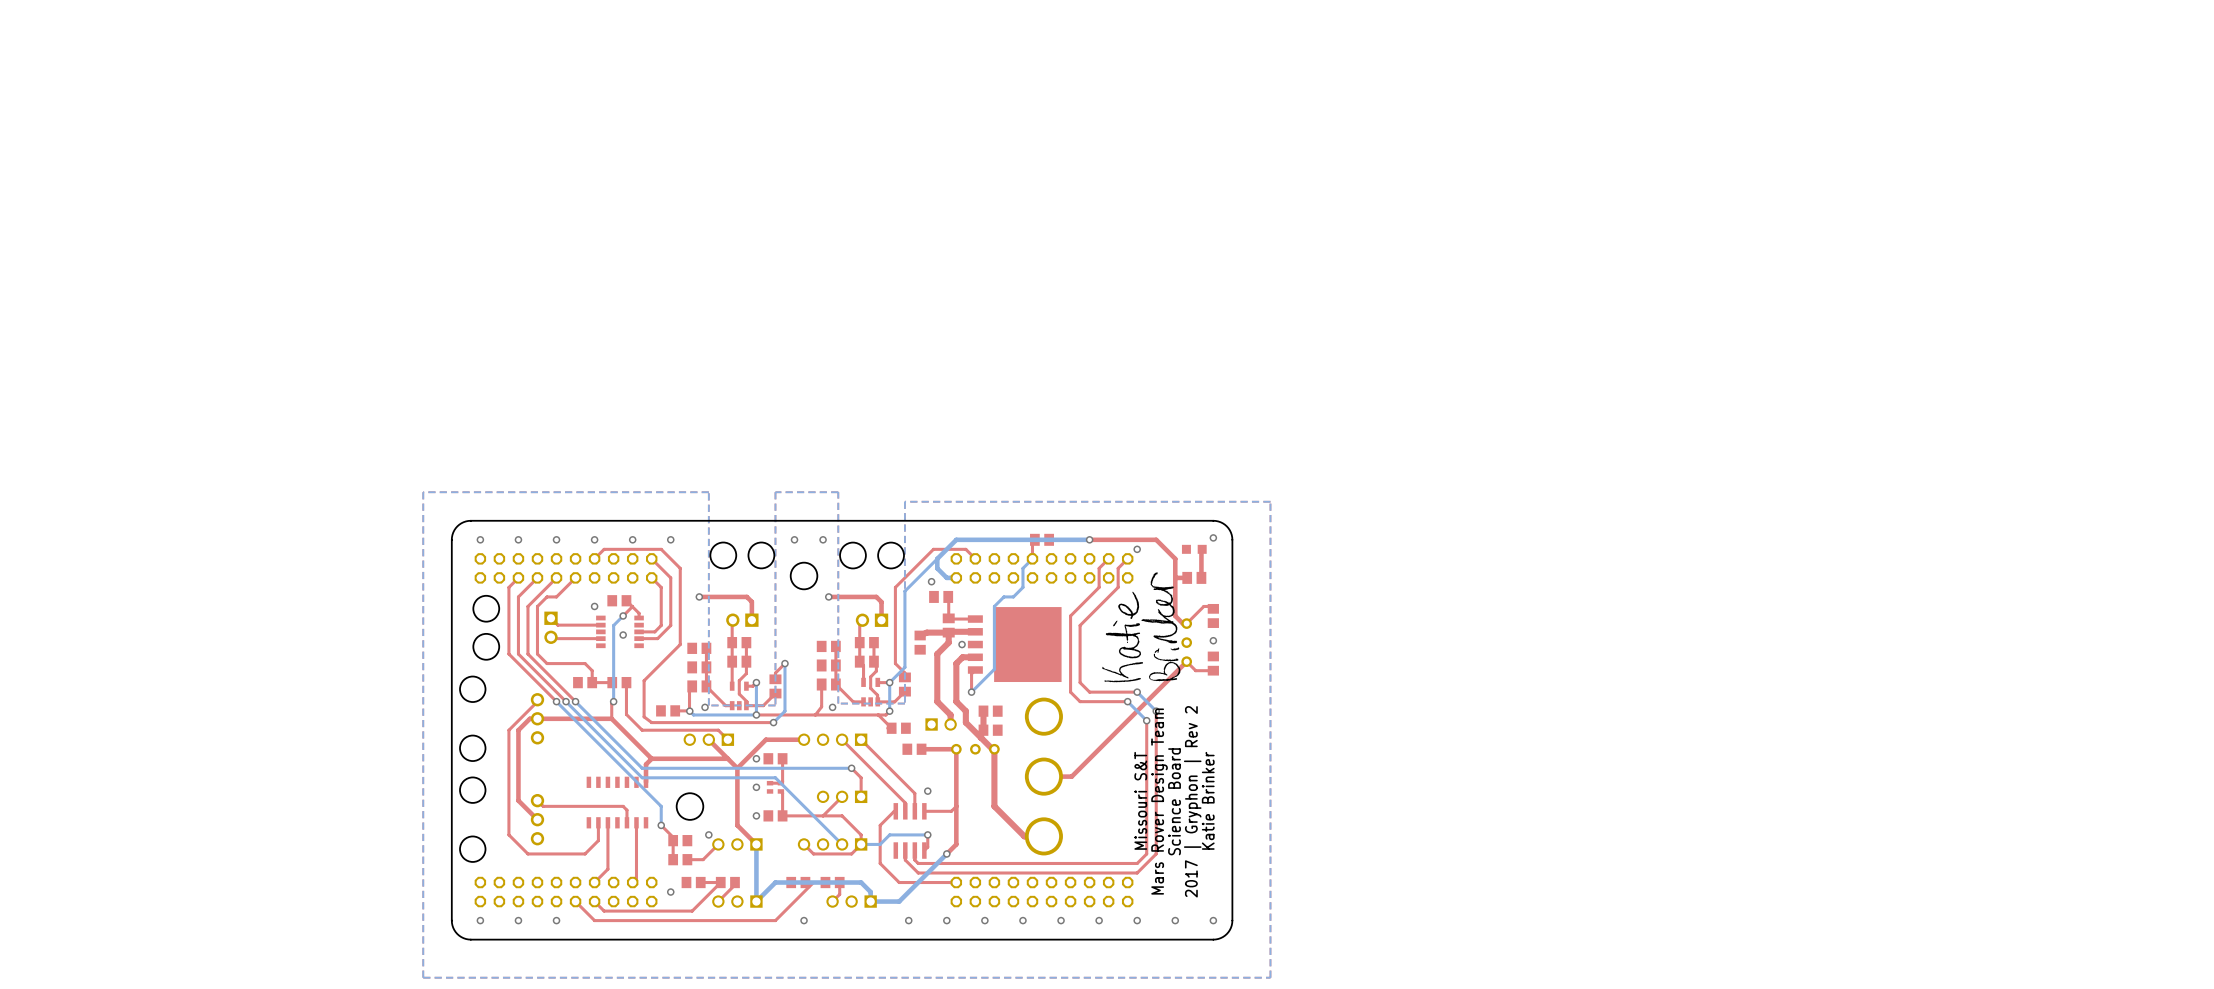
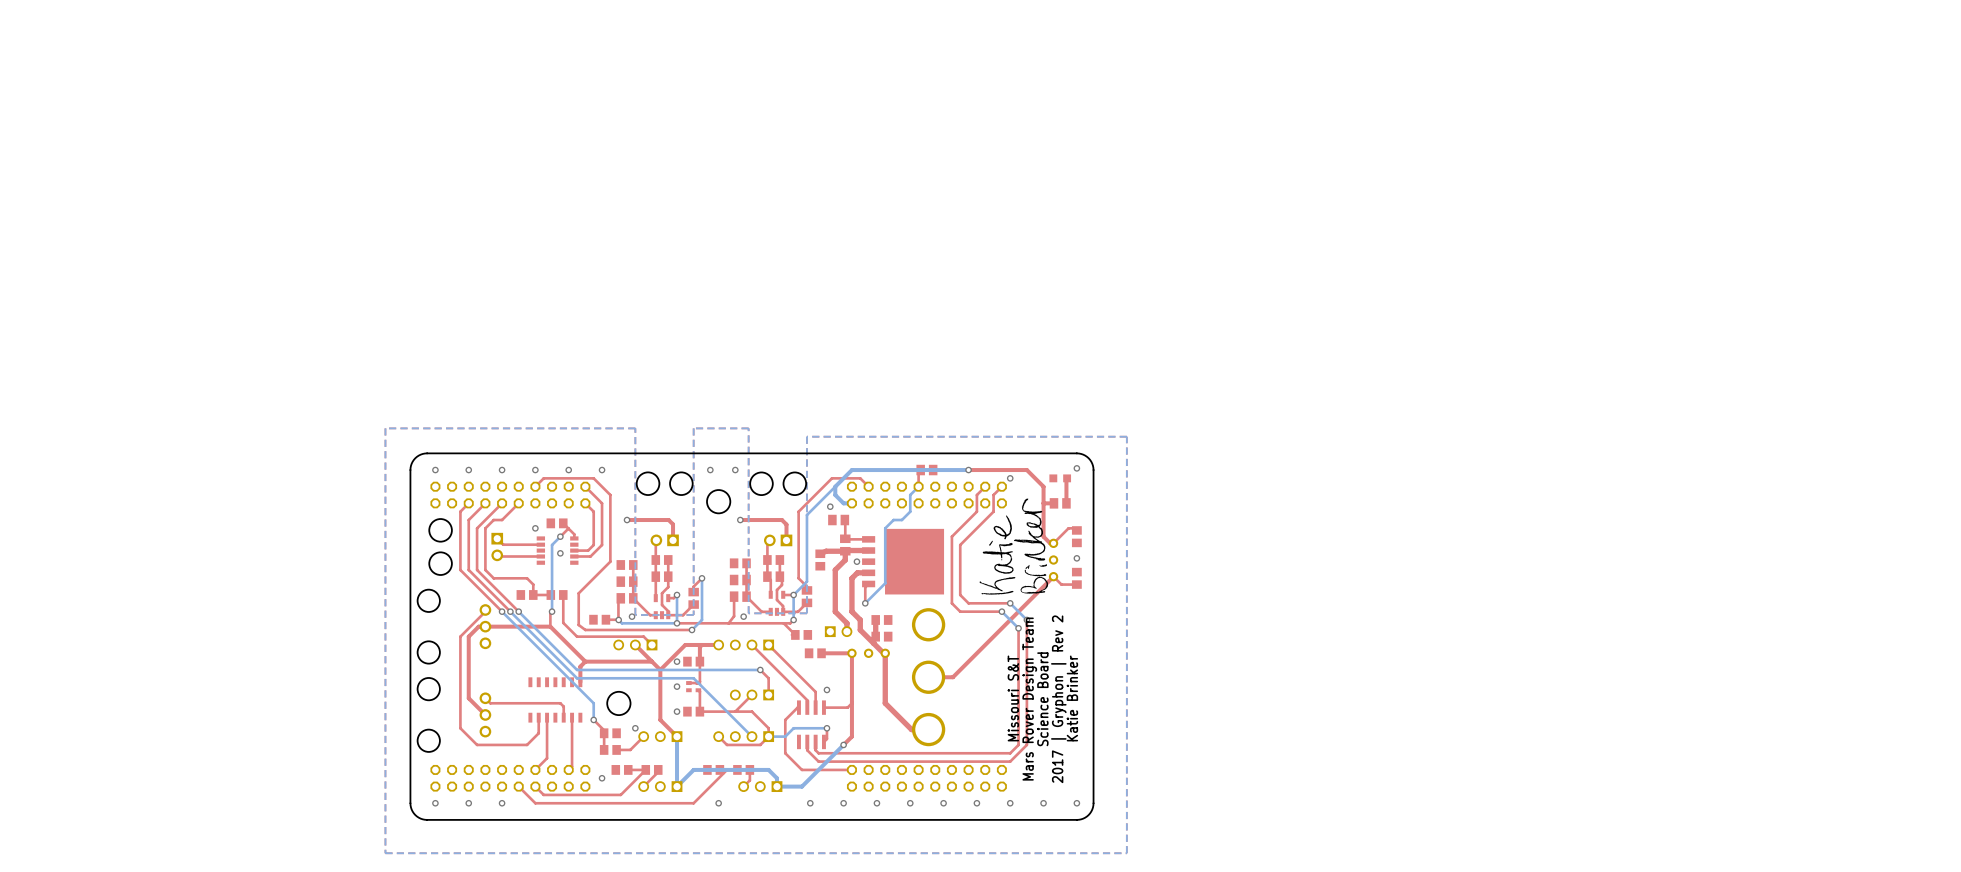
top track: none -> (702, 644) (699, 647) (699, 661)

